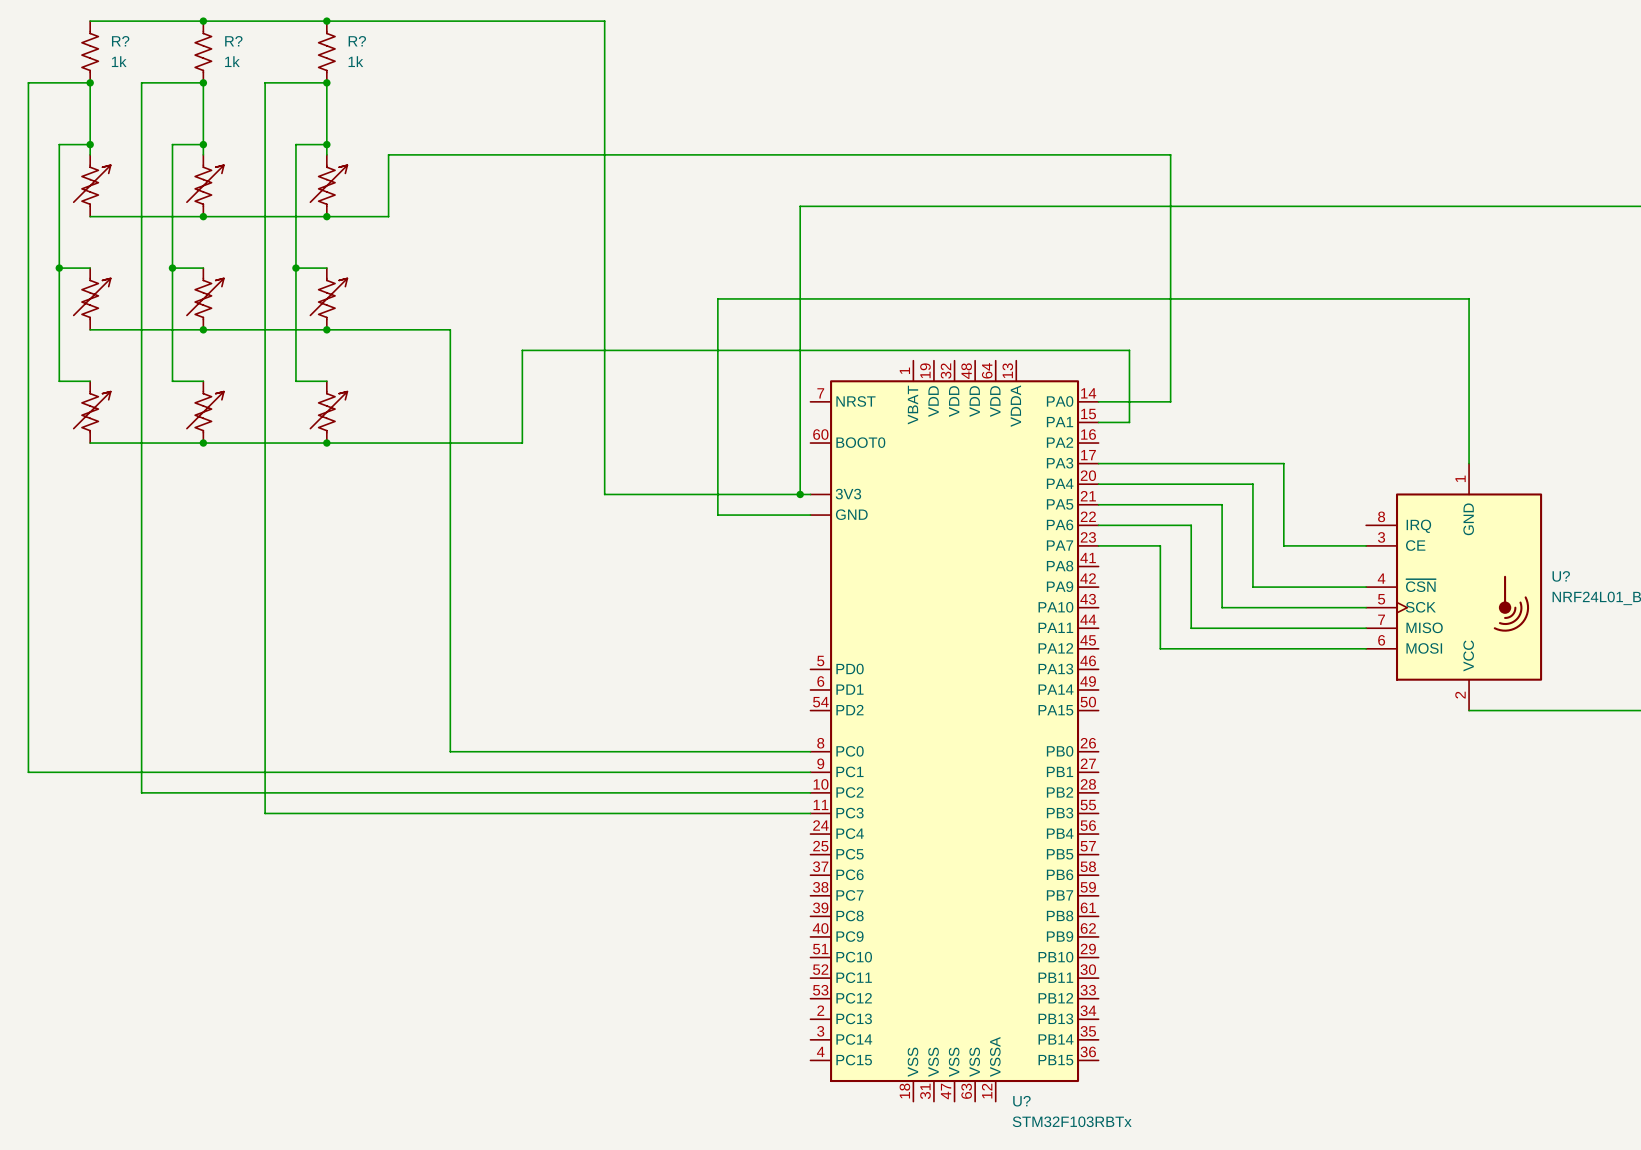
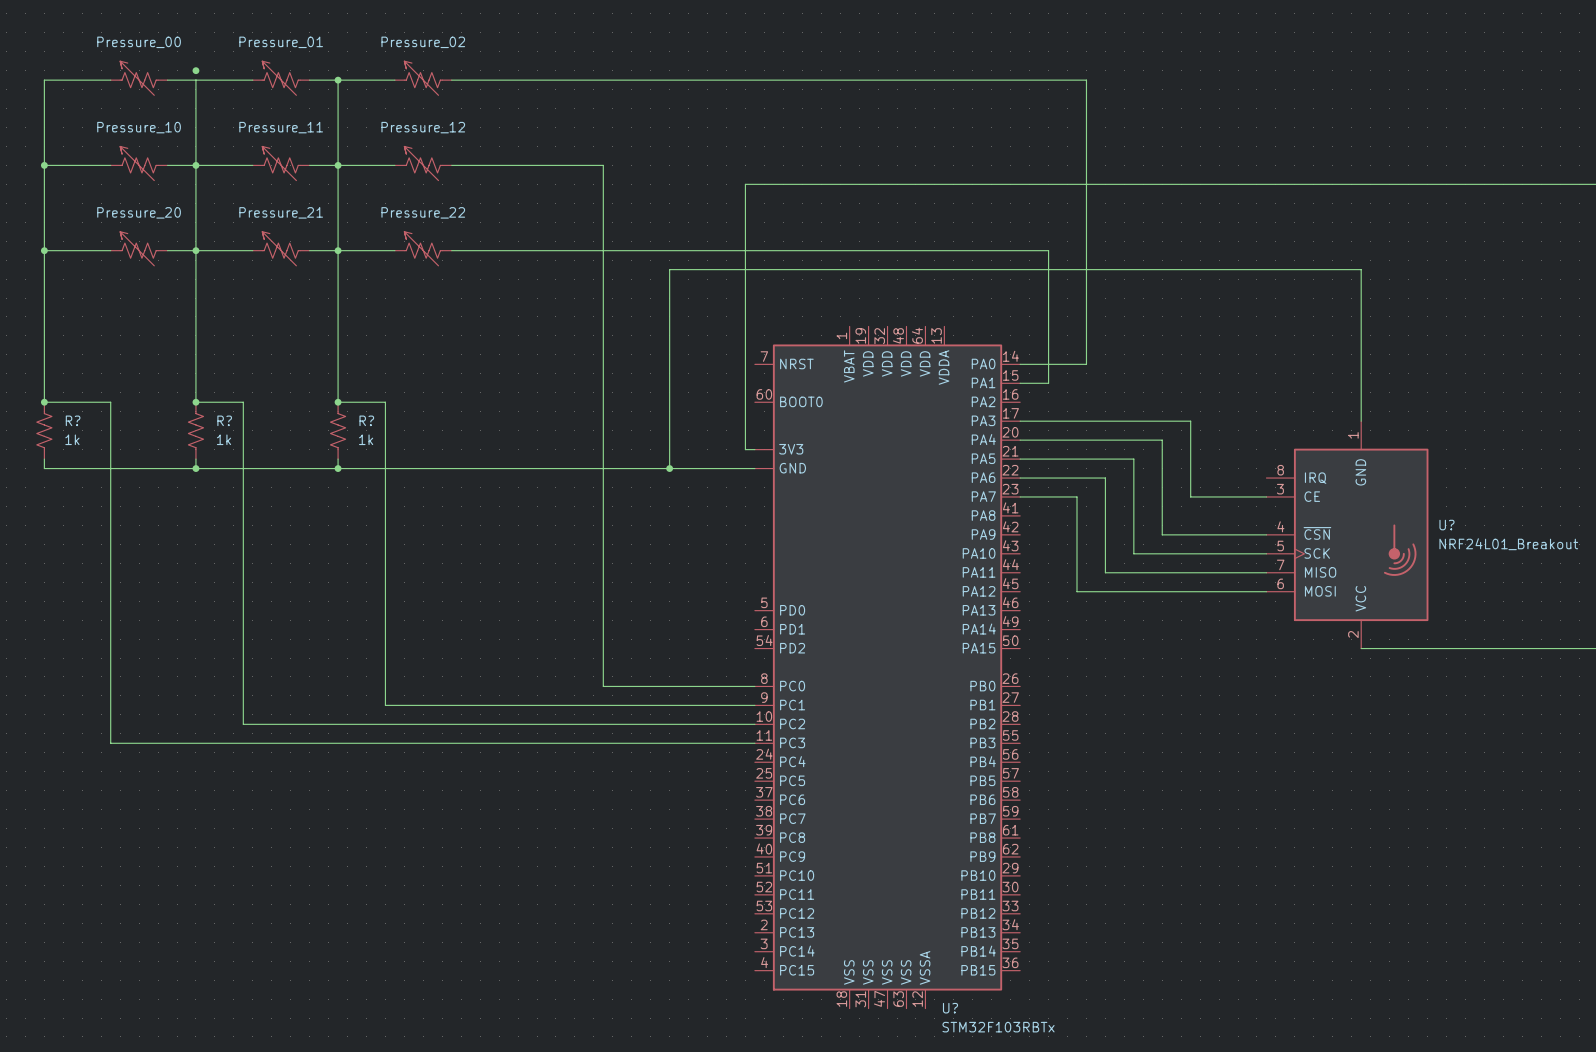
wire: (90, 21) (604, 21) (604, 494) (800, 494) -> none
junction: (203, 21) -> none
junction: (326, 21) -> none
R?: 1k (90, 51) -> none
R?: 1k (203, 51) -> none
R?: 1k (326, 51) -> none
junction: (90, 82) -> none
junction: (326, 82) -> none
Pressure_00: none -> (139, 78)
Pressure_01: none -> (281, 78)
Pressure_02: none -> (423, 78)
wire: none -> (110, 80) (44, 80) (44, 402) (91, 402)
wire: none -> (167, 80) (252, 80)
wire: (203, 93) (203, 82) (141, 82) (141, 792) (254, 792) -> (243, 402) (243, 724)
wire: none -> (309, 80) (394, 80)
junction: none -> (338, 80)
wire: (90, 144) (59, 144) (59, 381) (90, 381) -> none
junction: (90, 144) -> none
wire: (203, 144) (172, 144) (172, 381) (203, 381) -> none
junction: (203, 144) -> none
wire: (326, 144) (295, 144) (295, 381) (326, 381) -> none
junction: (326, 144) -> none
wire: (90, 154) (90, 82) (28, 82) (28, 772) (409, 772) -> (385, 402) (385, 705)
wire: (326, 154) (326, 82) (265, 82) (265, 813) -> (110, 402) (110, 743) (252, 743)
wire: (1170, 154) (388, 154) (388, 216) (90, 216) -> (1086, 136) (1086, 80) (451, 80)
Pressure_10: none -> (139, 163)
Pressure_11: none -> (281, 163)
Pressure_12: none -> (423, 163)
wire: none -> (44, 165) (110, 165)
junction: none -> (44, 165)
part: (92, 185) -> none
wire: none -> (167, 165) (252, 165)
junction: none -> (195, 165)
part: (205, 185) -> none
wire: none -> (309, 165) (394, 165)
part: (328, 185) -> none
junction: none -> (338, 165)
junction: (203, 216) -> none
junction: (326, 216) -> none
wire: (59, 268) (90, 268) -> none
junction position: (59, 268) -> (44, 250)
wire: (172, 268) (203, 268) -> none
junction: (172, 268) -> none
wire: (295, 268) (326, 268) -> none
junction: (295, 268) -> none
Pressure_20: none -> (139, 248)
Pressure_21: none -> (281, 248)
Pressure_22: none -> (423, 248)
wire: none -> (44, 250) (110, 250)
wire: none -> (167, 250) (252, 250)
junction: none -> (195, 250)
wire: none -> (309, 250) (394, 250)
junction: none -> (338, 250)
part: (92, 298) -> none
part: (205, 298) -> none
part: (328, 298) -> none
wire: (90, 329) (450, 329) (450, 751) (645, 751) -> (451, 165) (603, 165) (603, 686)
junction: (203, 329) -> none
junction: (326, 329) -> none
wire: (1129, 350) (522, 350) (522, 443) (409, 443) -> (1048, 316) (1048, 250) (451, 250)
part: (92, 412) -> none
part: (205, 412) -> none
part: (328, 412) -> none
junction: none -> (44, 402)
wire: (110, 443) (203, 443) -> (195, 136) (195, 402)
wire: (254, 443) (357, 443) -> (338, 80) (338, 402)
junction position: (326, 443) -> (338, 402)
R?: none -> 1k (44, 430)
R?: none -> 1k (195, 430)
R?: none -> 1k (338, 430)
junction: (800, 494) -> none
wire: none -> (44, 459) (44, 468) (669, 468)
wire: none -> (195, 459) (195, 468)
wire: none -> (338, 459) (338, 468)
junction: none -> (195, 468)
junction: none -> (338, 468)
junction: none -> (669, 468)

